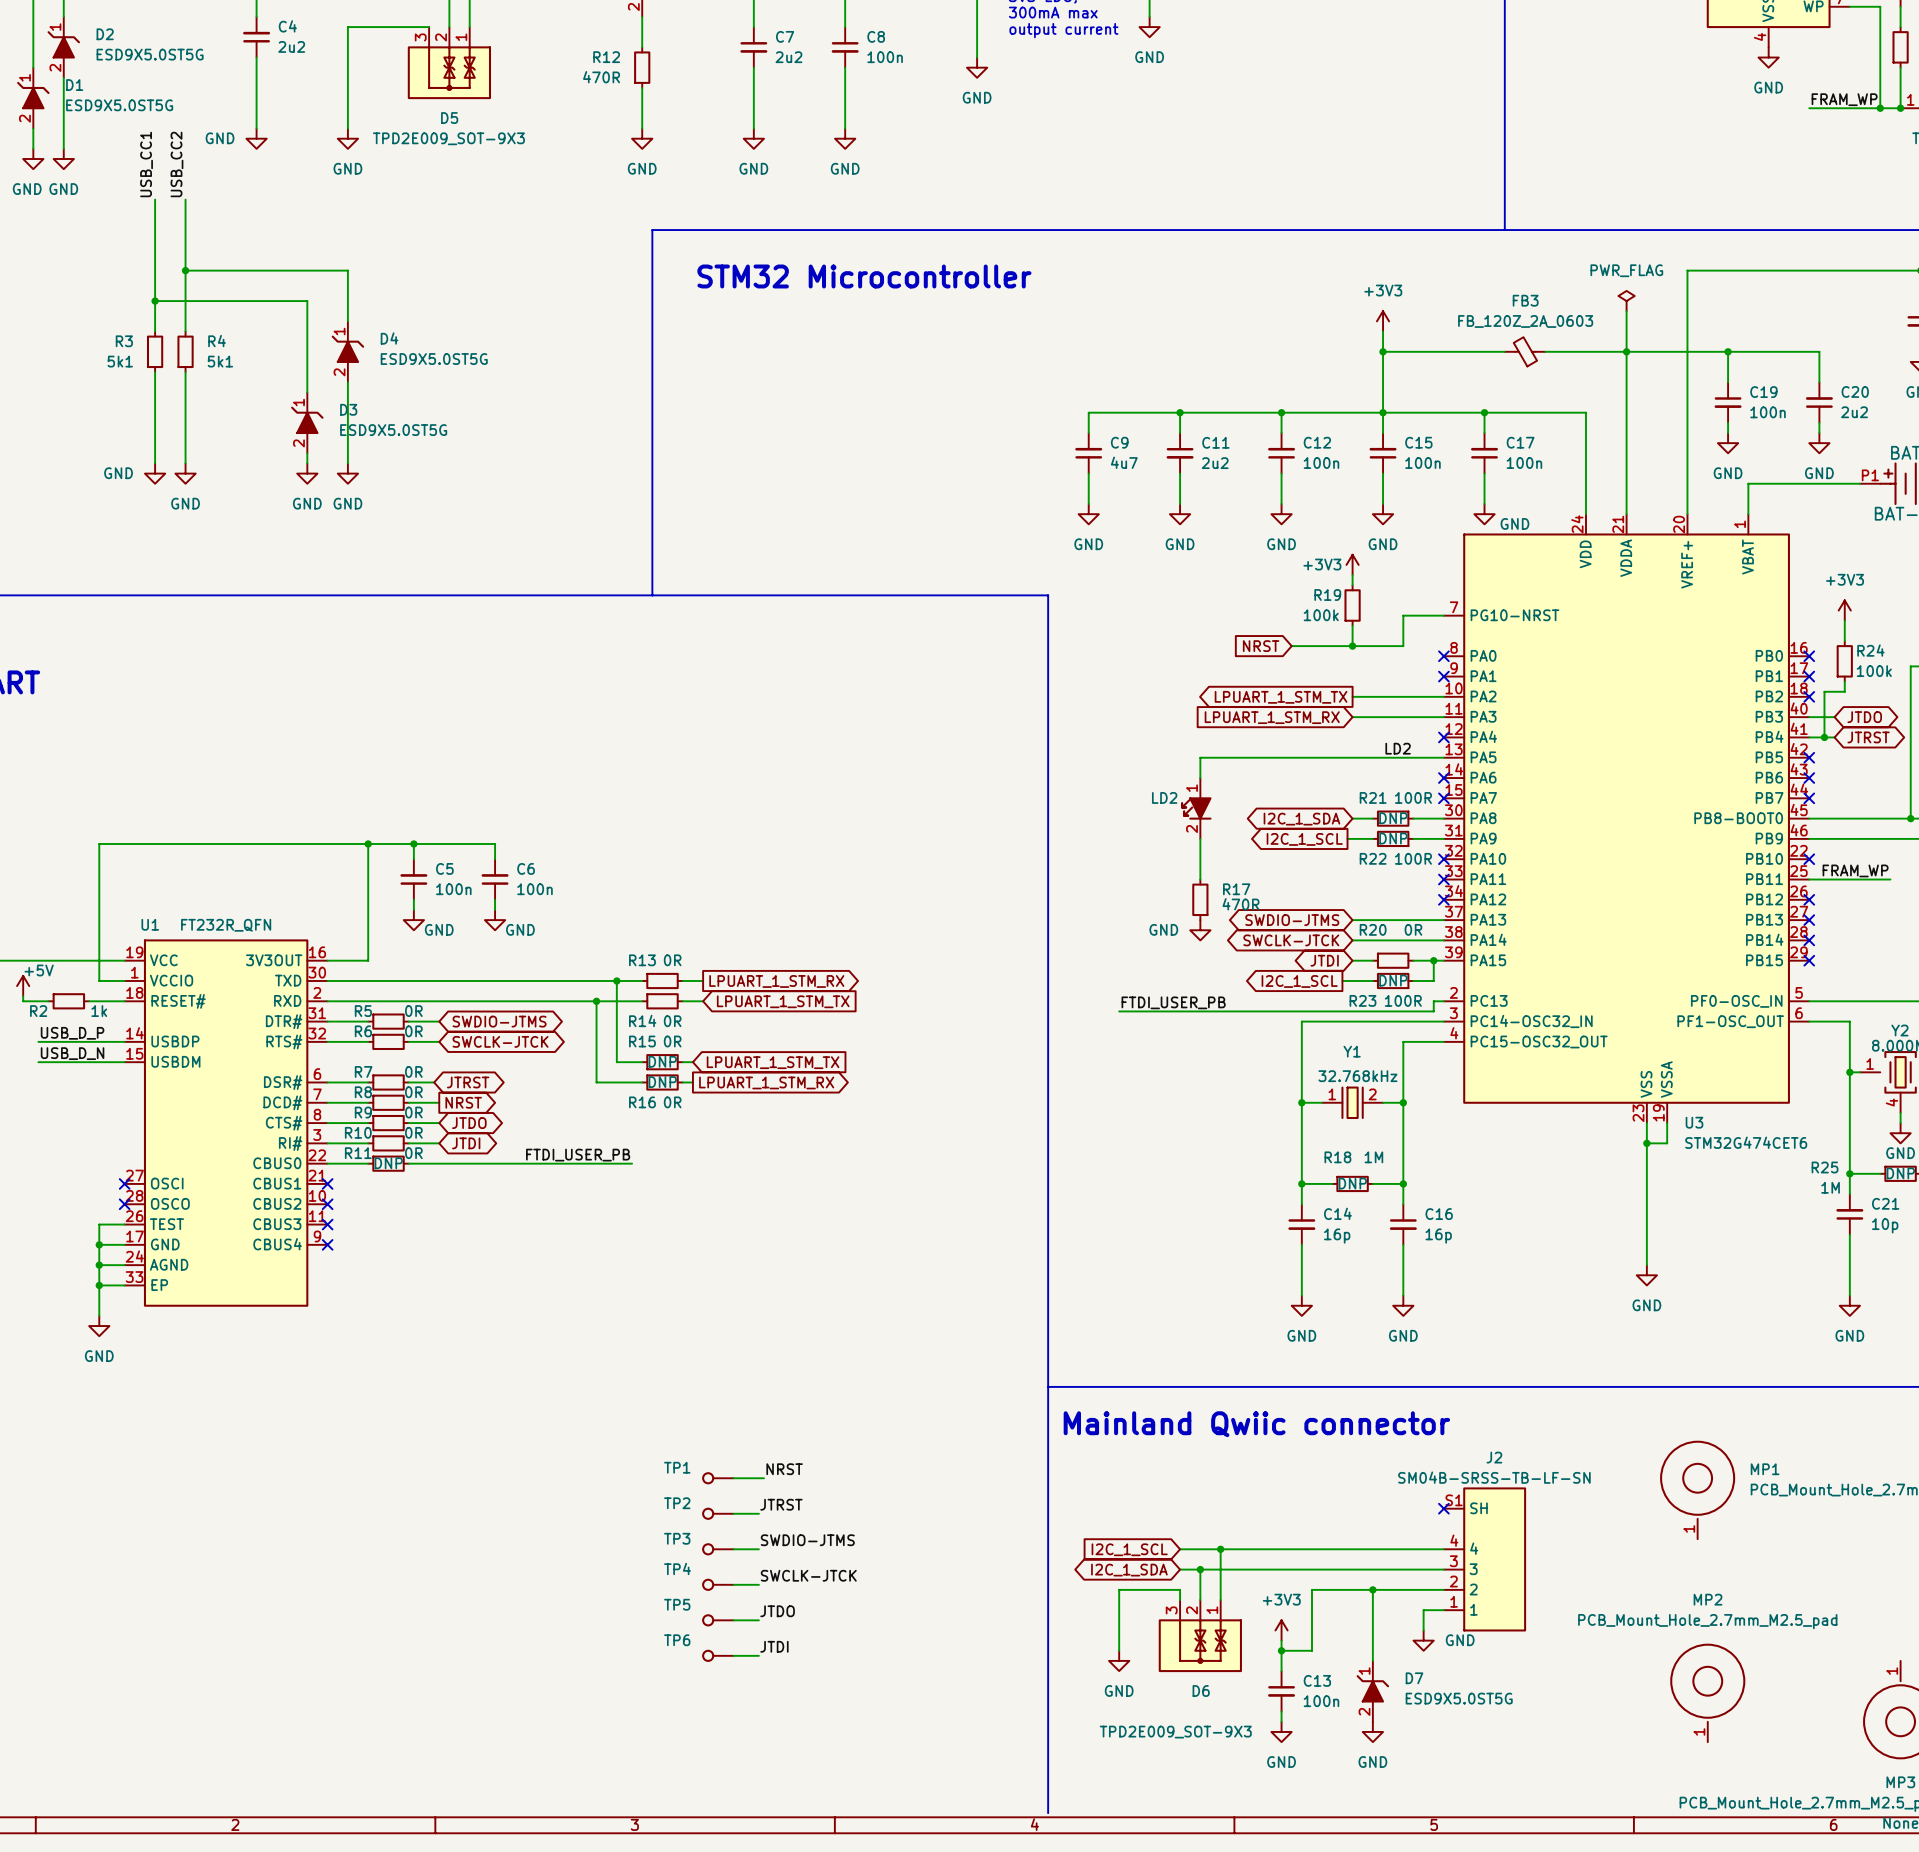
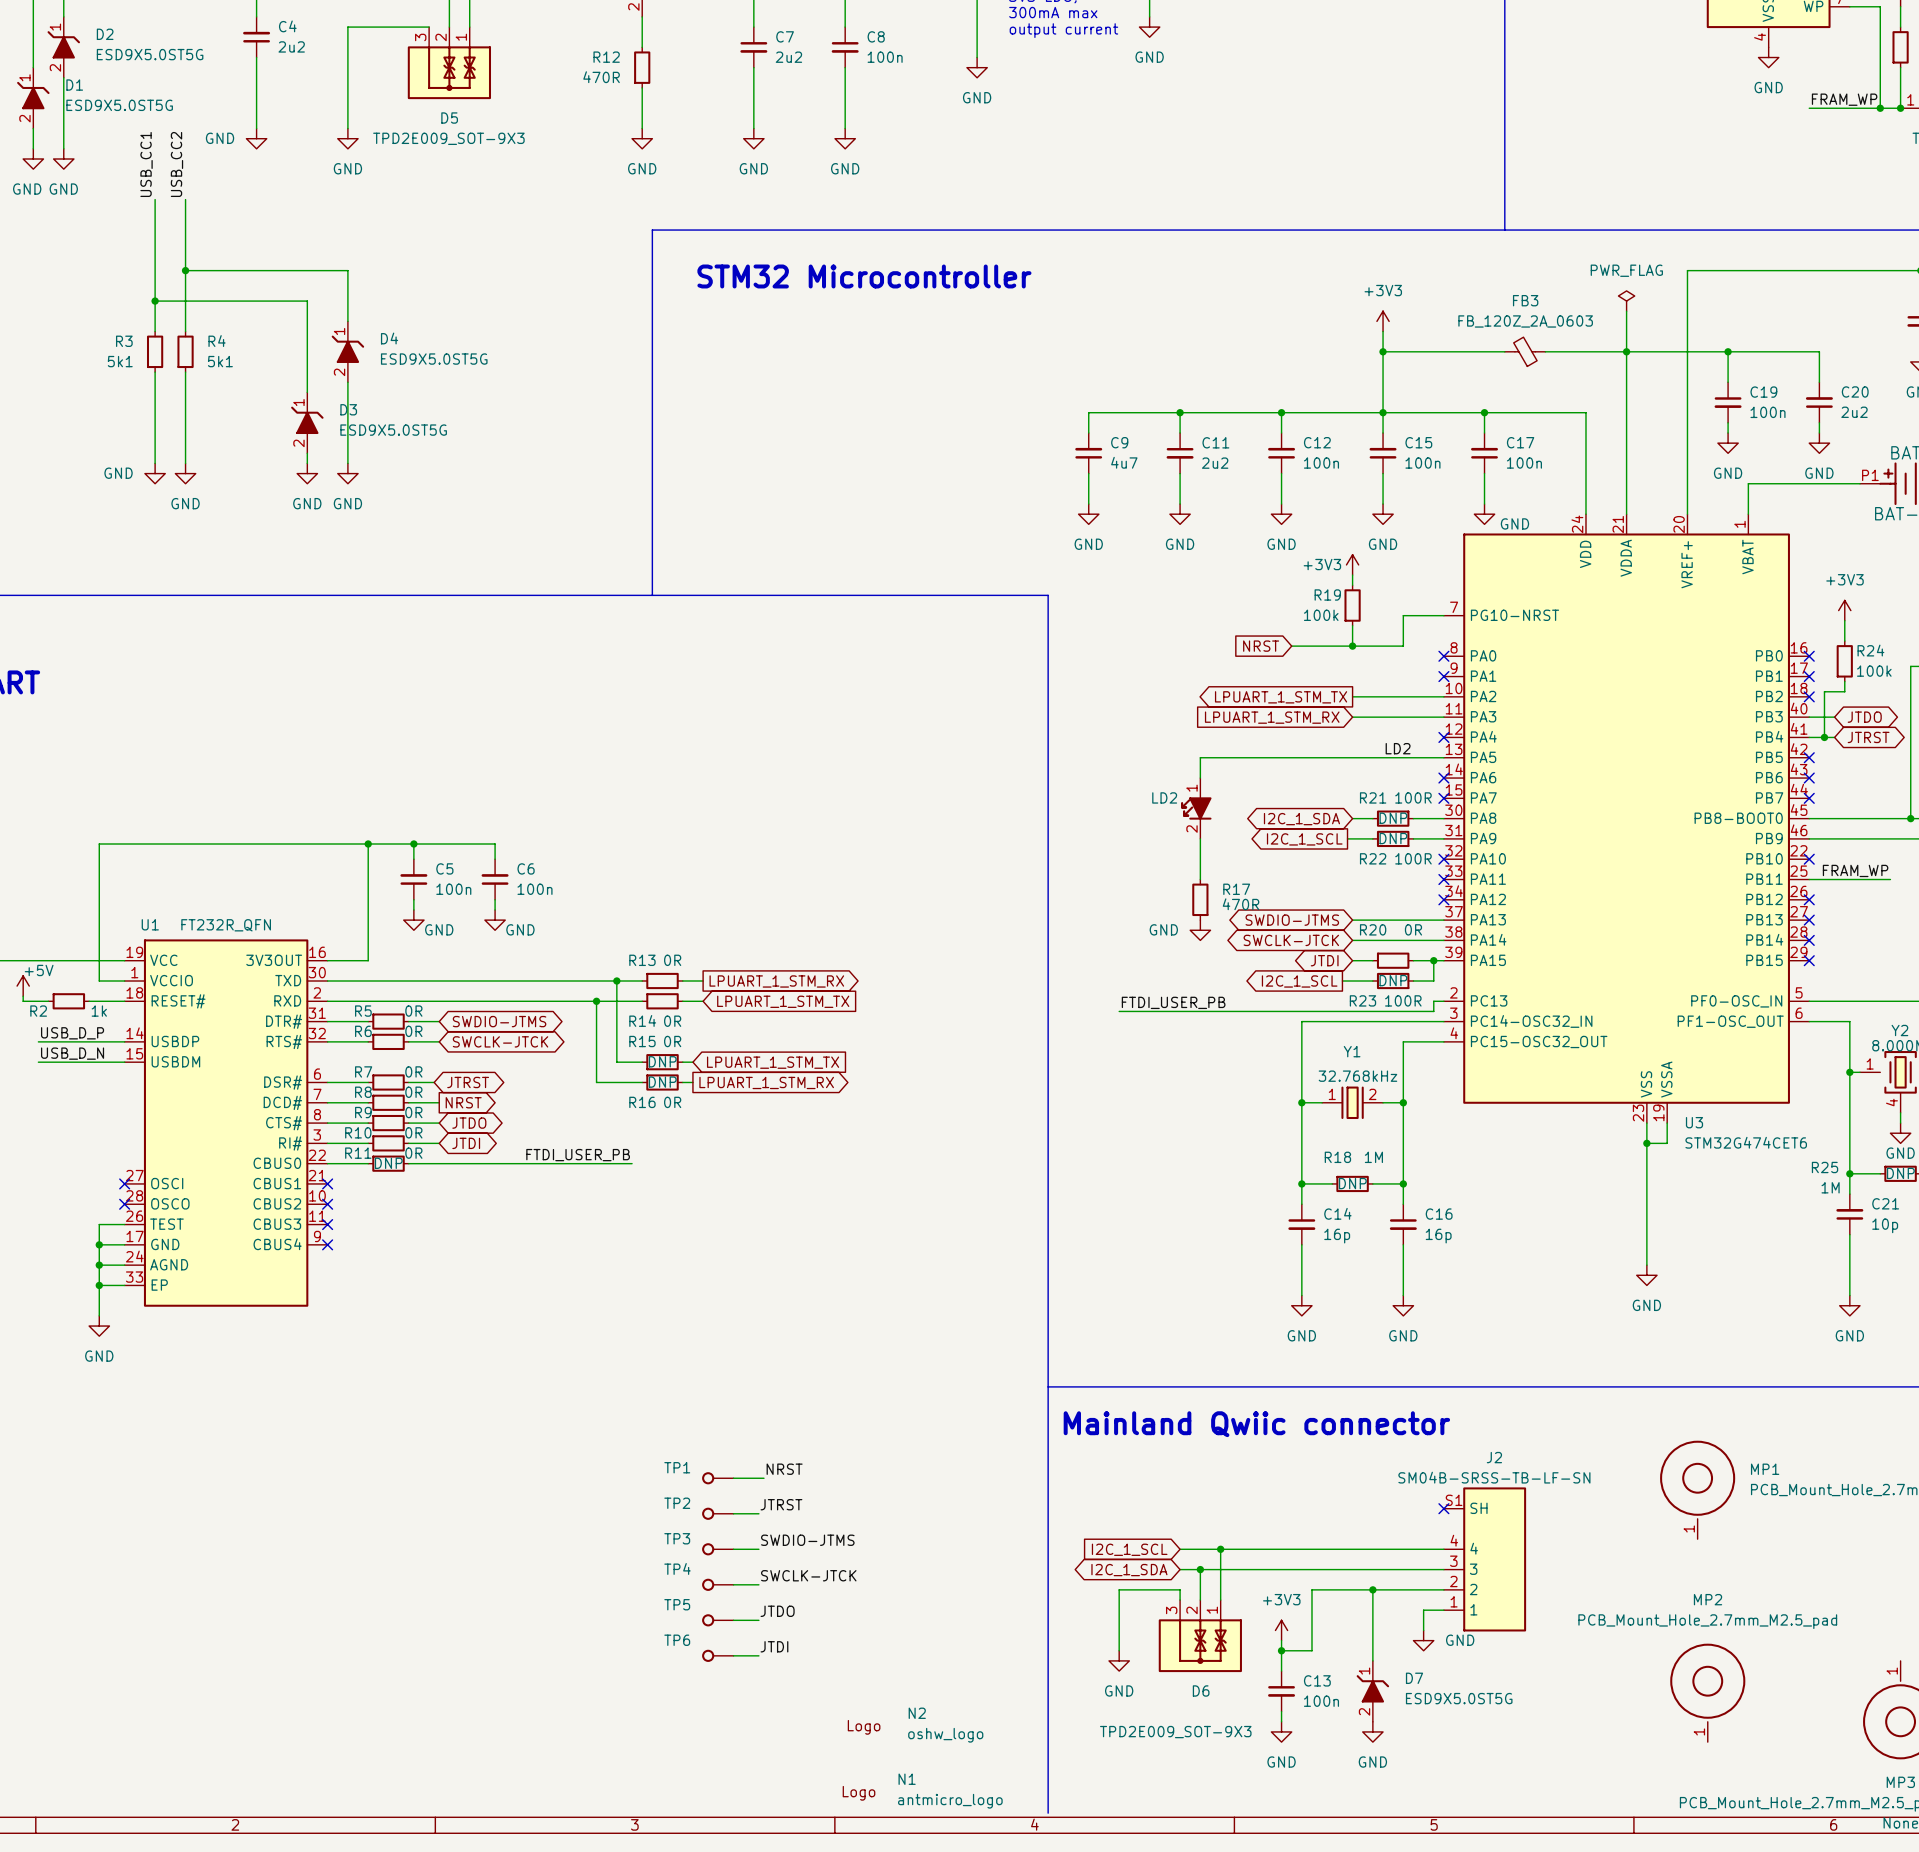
N2: none -> oshw_logo (915, 1725)
N1: none -> antmicro_logo (922, 1791)

